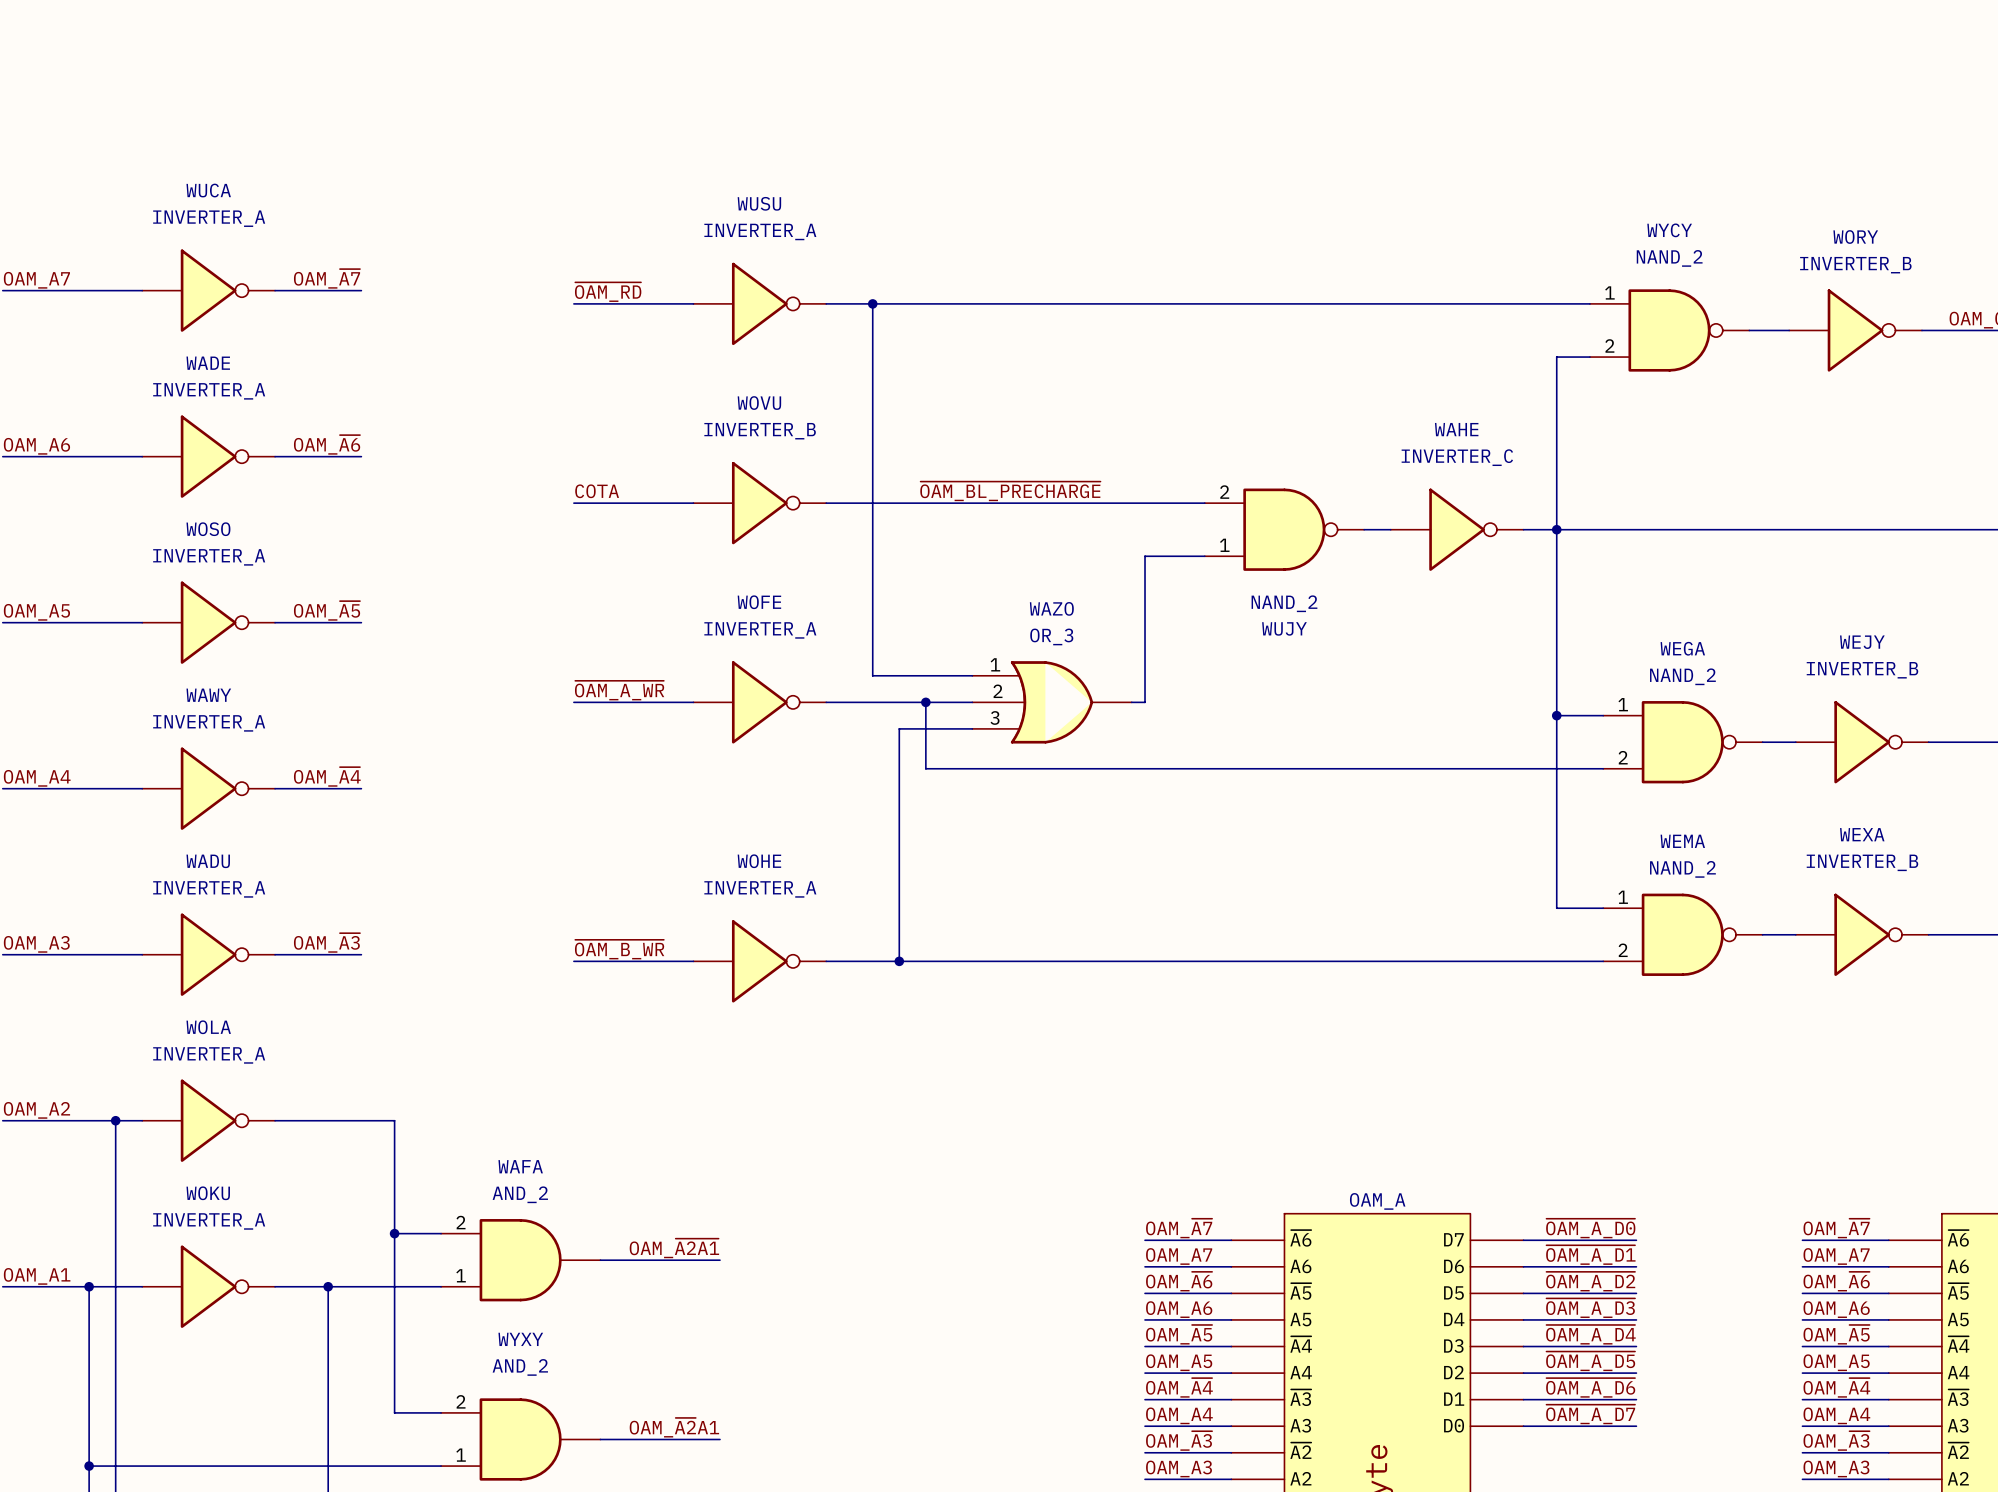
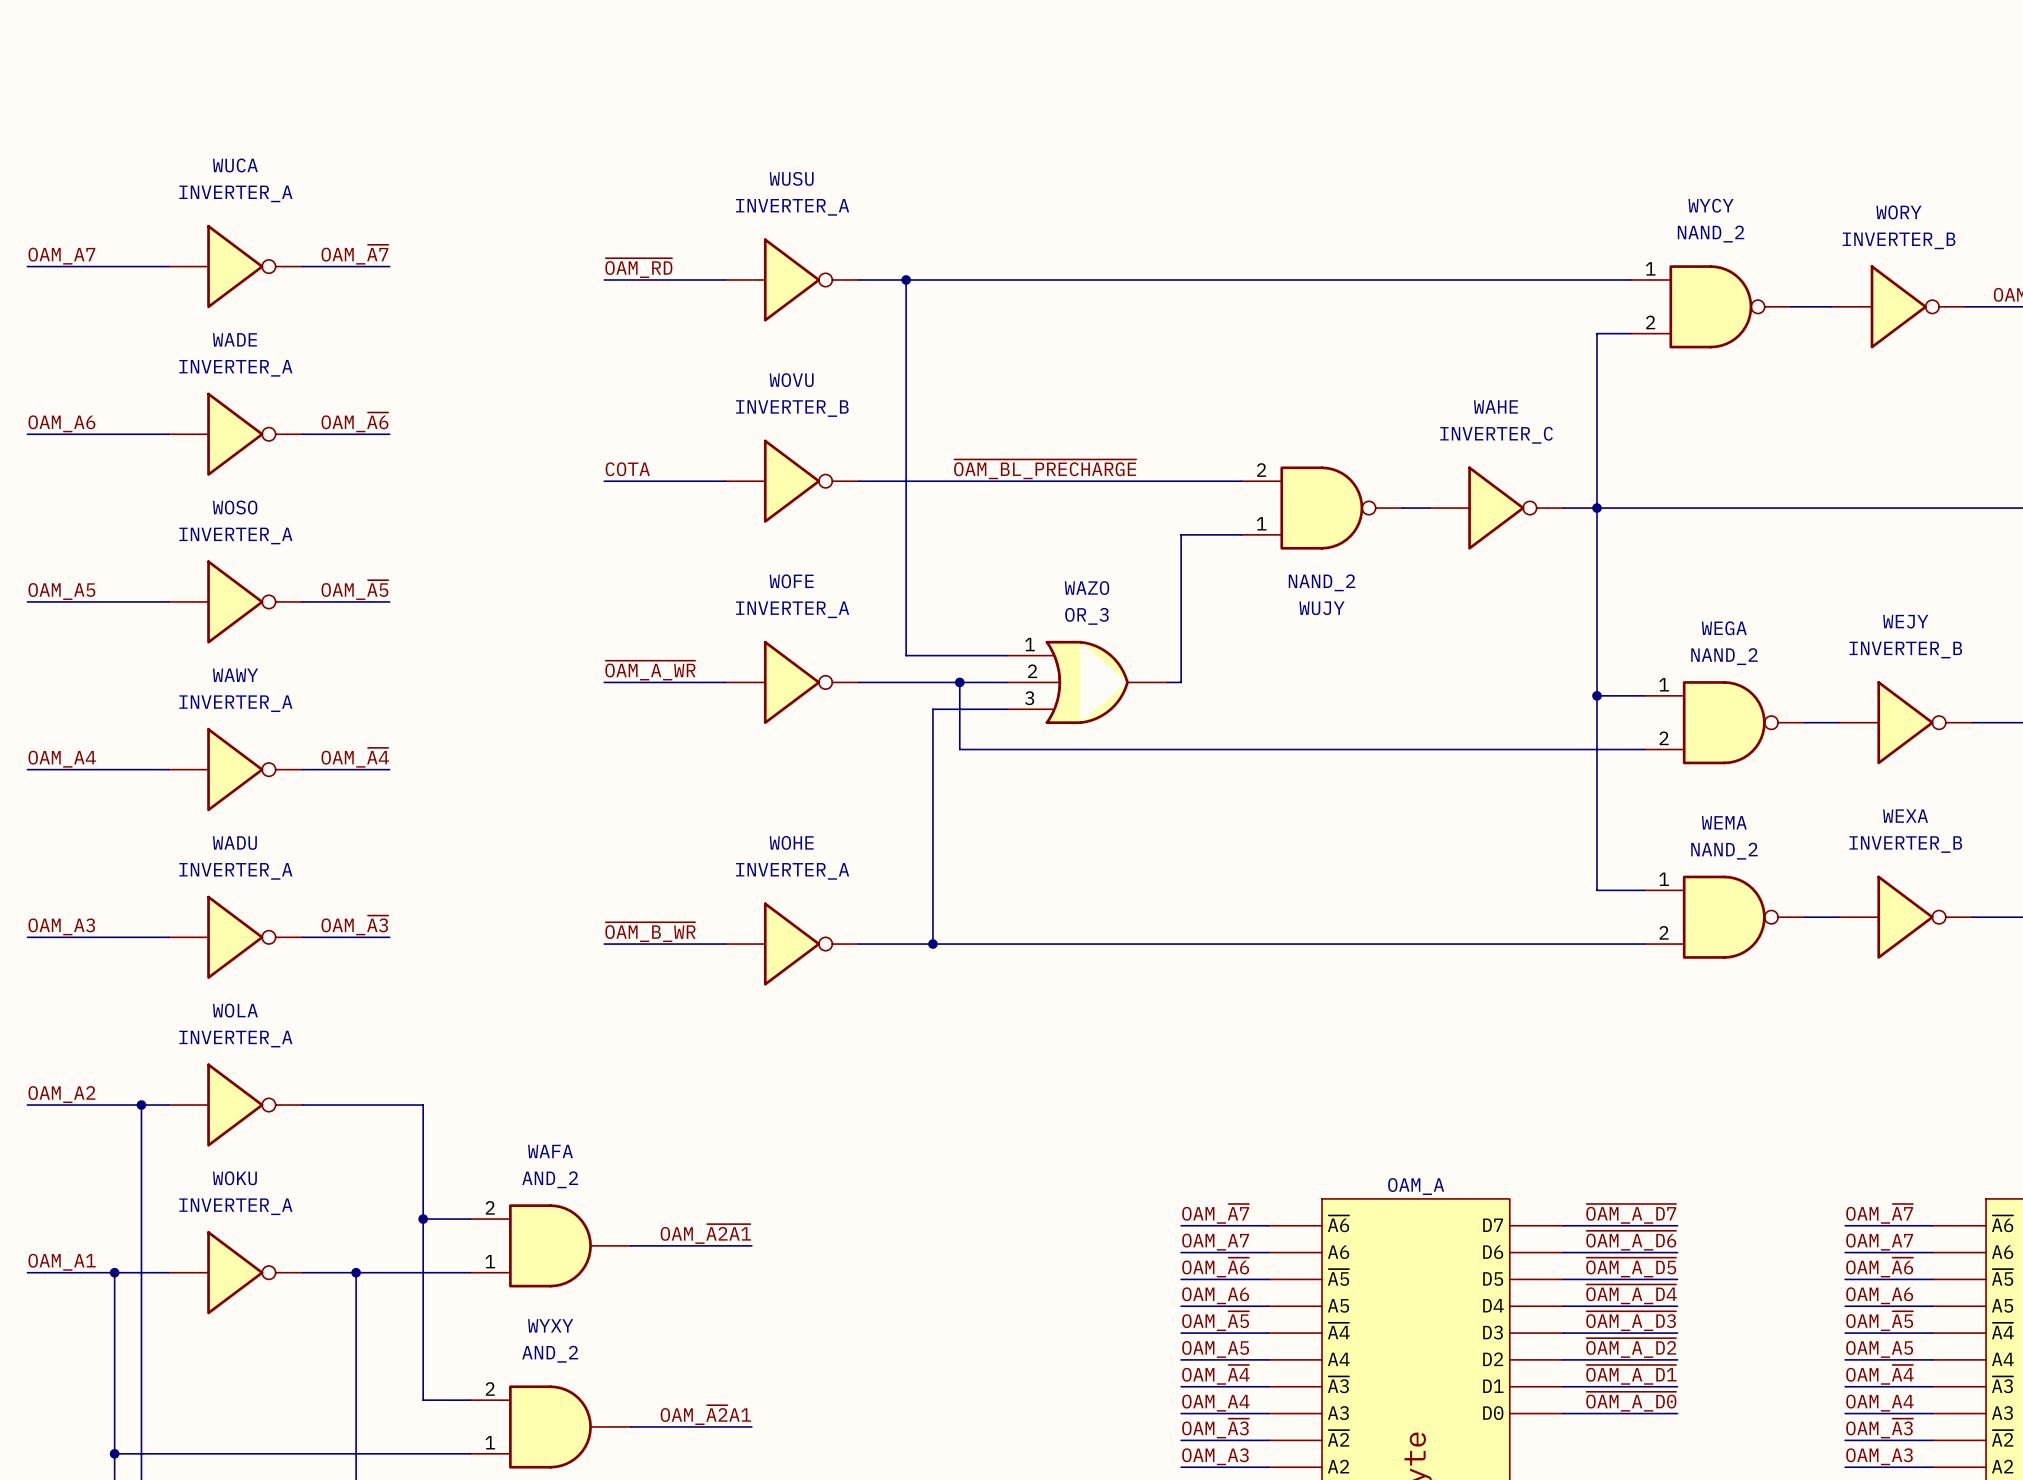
label: ~{OAM_A_D0} (1590, 1228) -> ~{OAM_A_D7} (1631, 1213)
label: ~{OAM_A_D1} (1590, 1255) -> ~{OAM_A_D6} (1631, 1240)
label: ~{OAM_A_D2} (1590, 1281) -> ~{OAM_A_D5} (1631, 1267)
label: ~{OAM_A_D3} (1590, 1308) -> ~{OAM_A_D4} (1631, 1294)
label: ~{OAM_A_D4} (1590, 1334) -> ~{OAM_A_D3} (1631, 1321)
label: ~{OAM_A_D5} (1590, 1361) -> ~{OAM_A_D2} (1631, 1348)
label: ~{OAM_A_D6} (1590, 1387) -> ~{OAM_A_D1} (1631, 1374)
label: ~{OAM_A_D7} (1590, 1414) -> ~{OAM_A_D0} (1631, 1401)

